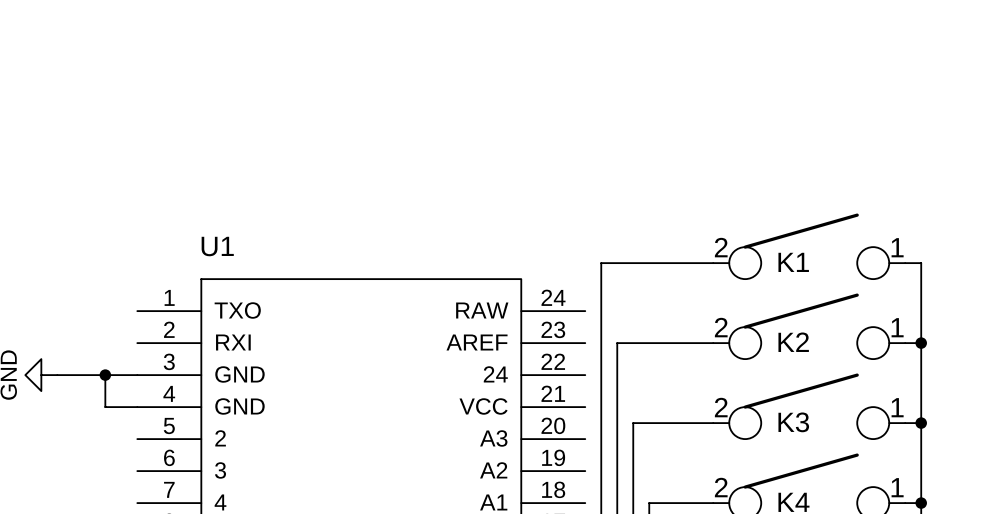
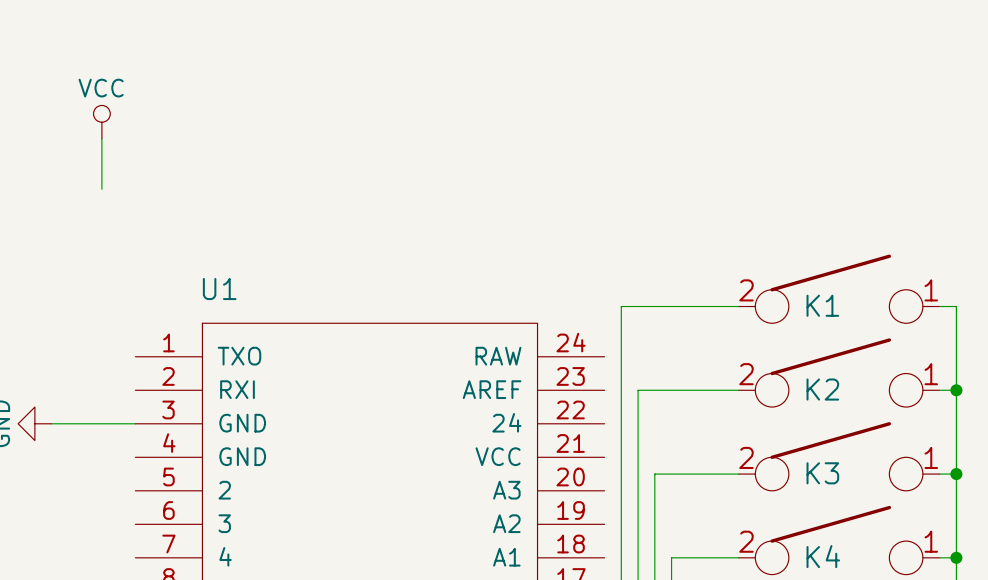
power symbol: none -> VCC (101, 122)
wire: none -> (101, 138) (101, 189)
wire: (105, 375) (105, 407) (137, 407) -> none
junction: (105, 375) -> none

